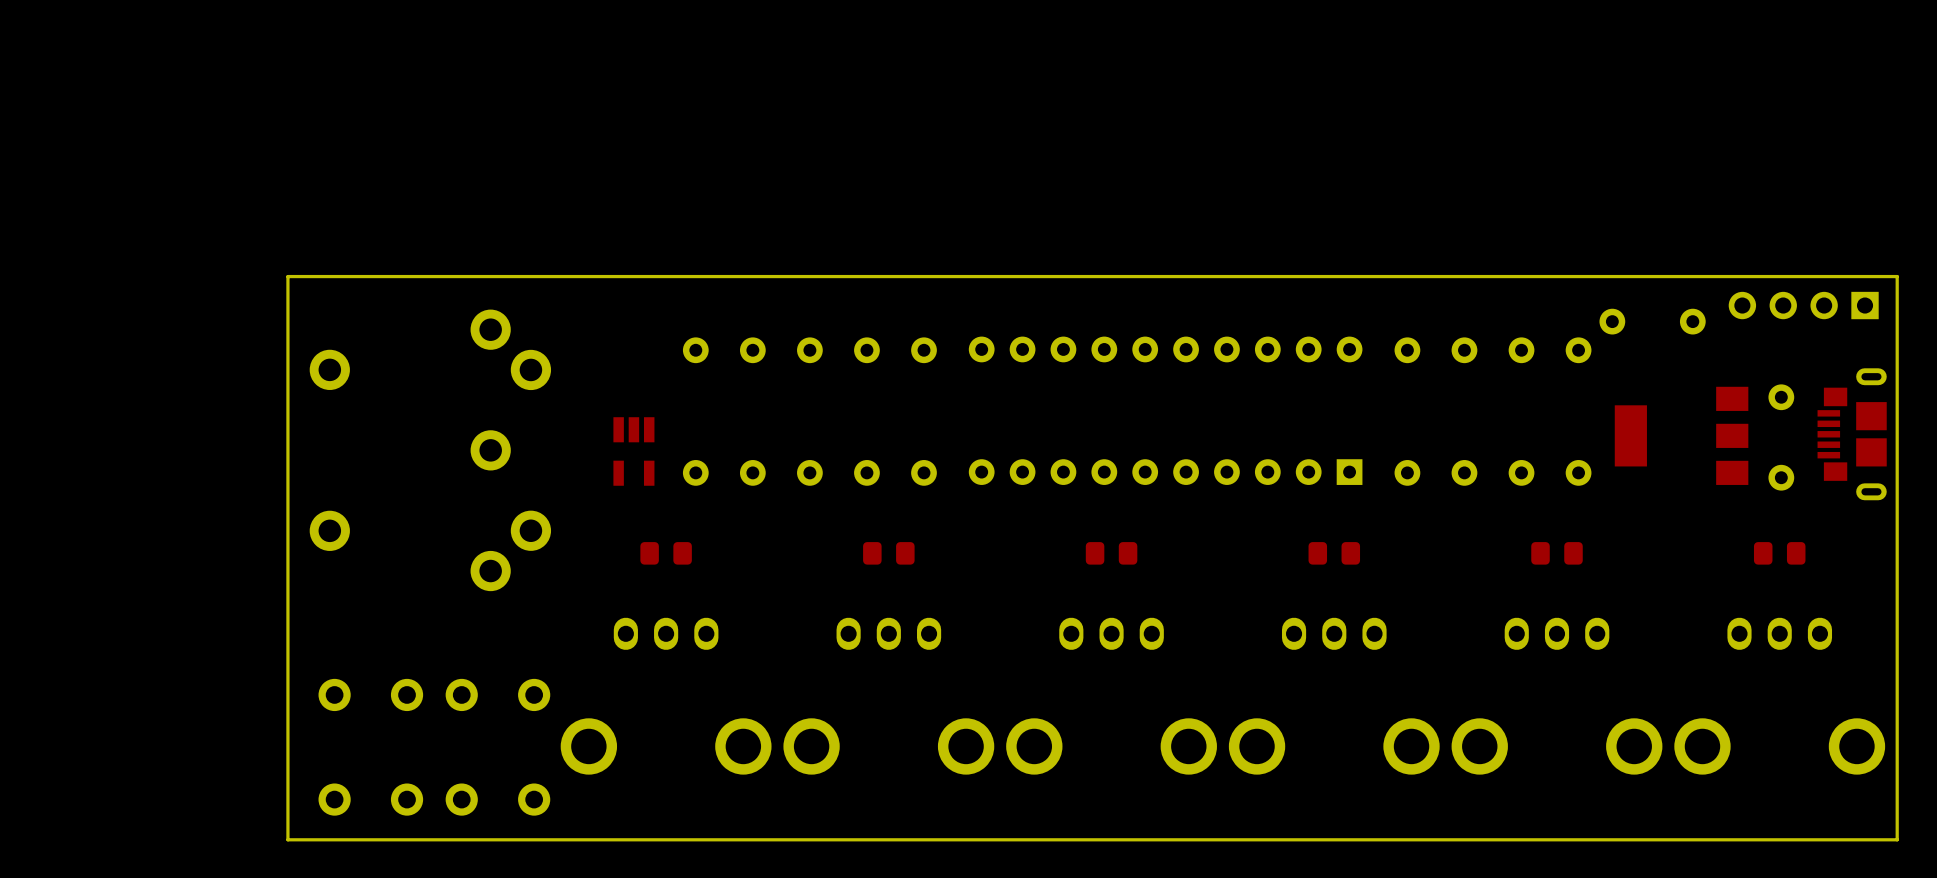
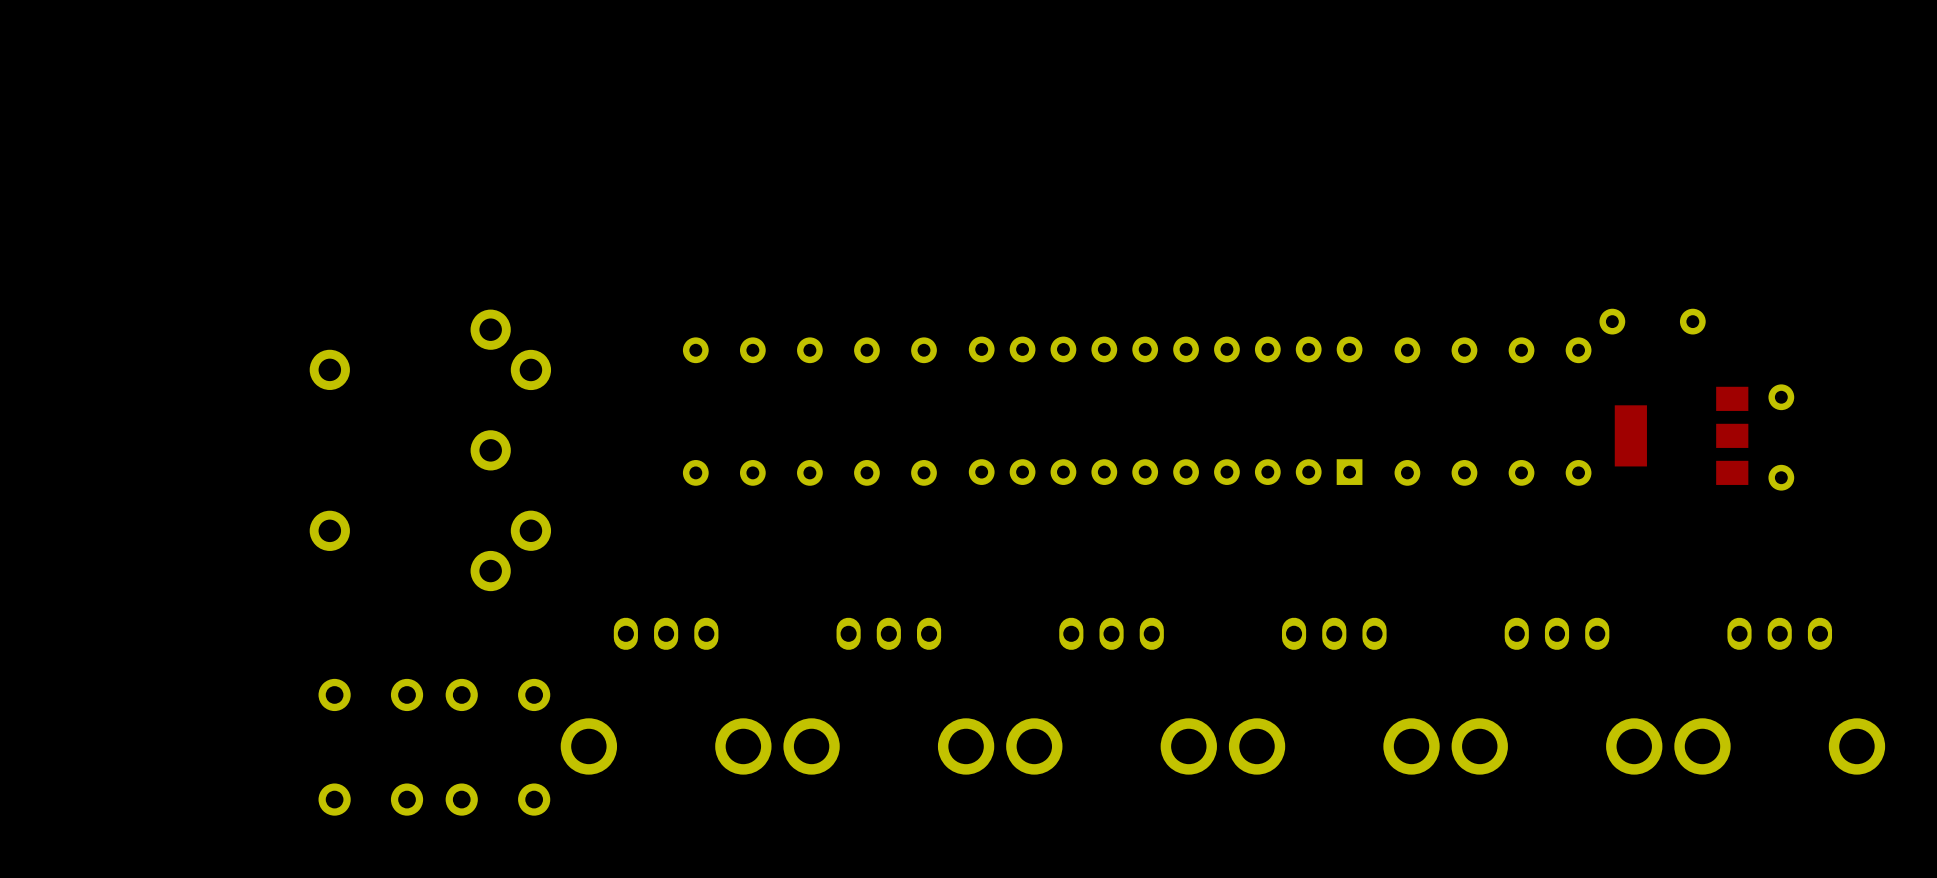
board edge: (1897, 276) (287, 276) (287, 839) (1897, 839) (1897, 276) -> none
part: (1803, 305) -> none
part: (1852, 434) -> none
part: (633, 451) -> none
part: (666, 553) -> none
part: (888, 553) -> none
part: (1111, 553) -> none
part: (1334, 553) -> none
part: (1557, 553) -> none
part: (1779, 553) -> none

